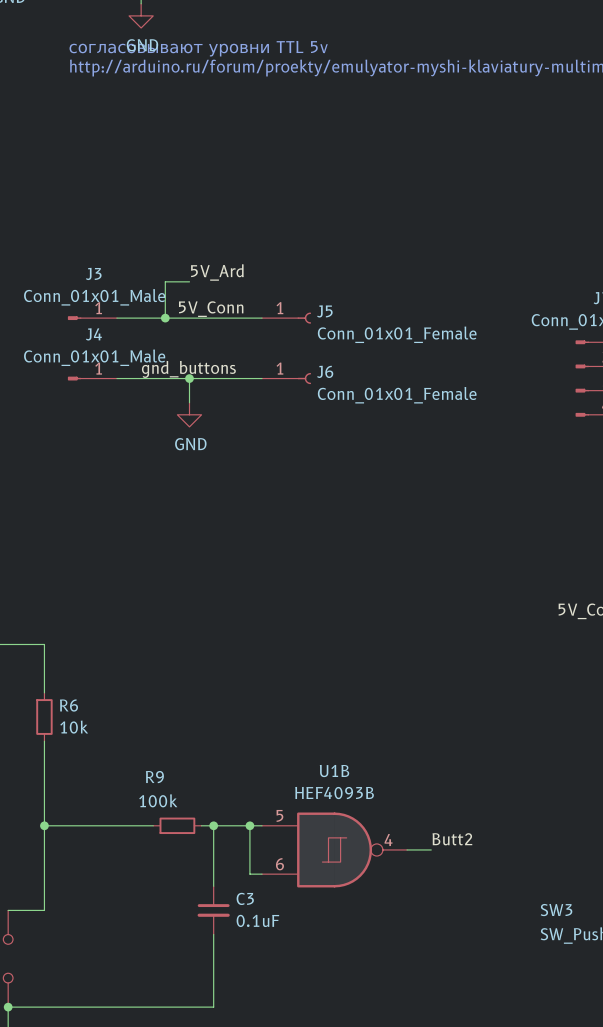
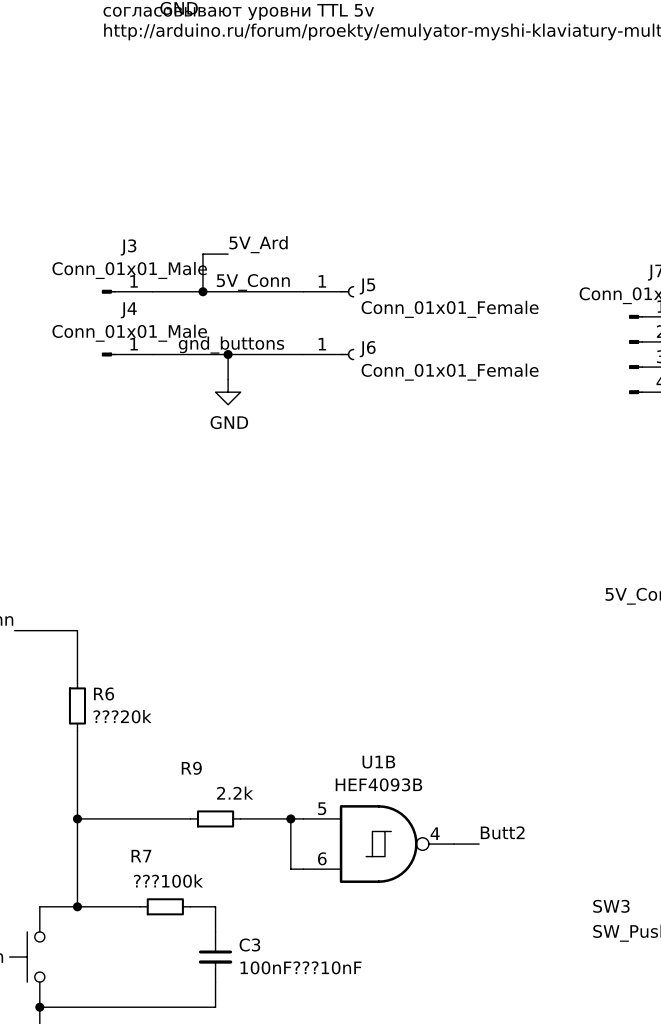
R6 value: 10k (74, 727) -> ???20k (122, 716)
R9 value: 100k (158, 800) -> 2.2k (235, 793)
wire: (213, 825) (213, 886) -> none
junction: (213, 825) -> none
wire: none -> (77, 906) (140, 906)
junction: none -> (77, 906)
R7: none -> ???100k (165, 906)
wire: none -> (190, 906) (215, 906) (215, 931)
C3 position: (213, 910) -> (215, 957)
C3 value: 0.1uF (257, 920) -> 100nF???10nF (300, 967)
wire: (213, 934) (213, 1007) (177, 1007) -> (215, 982) (215, 1007)

